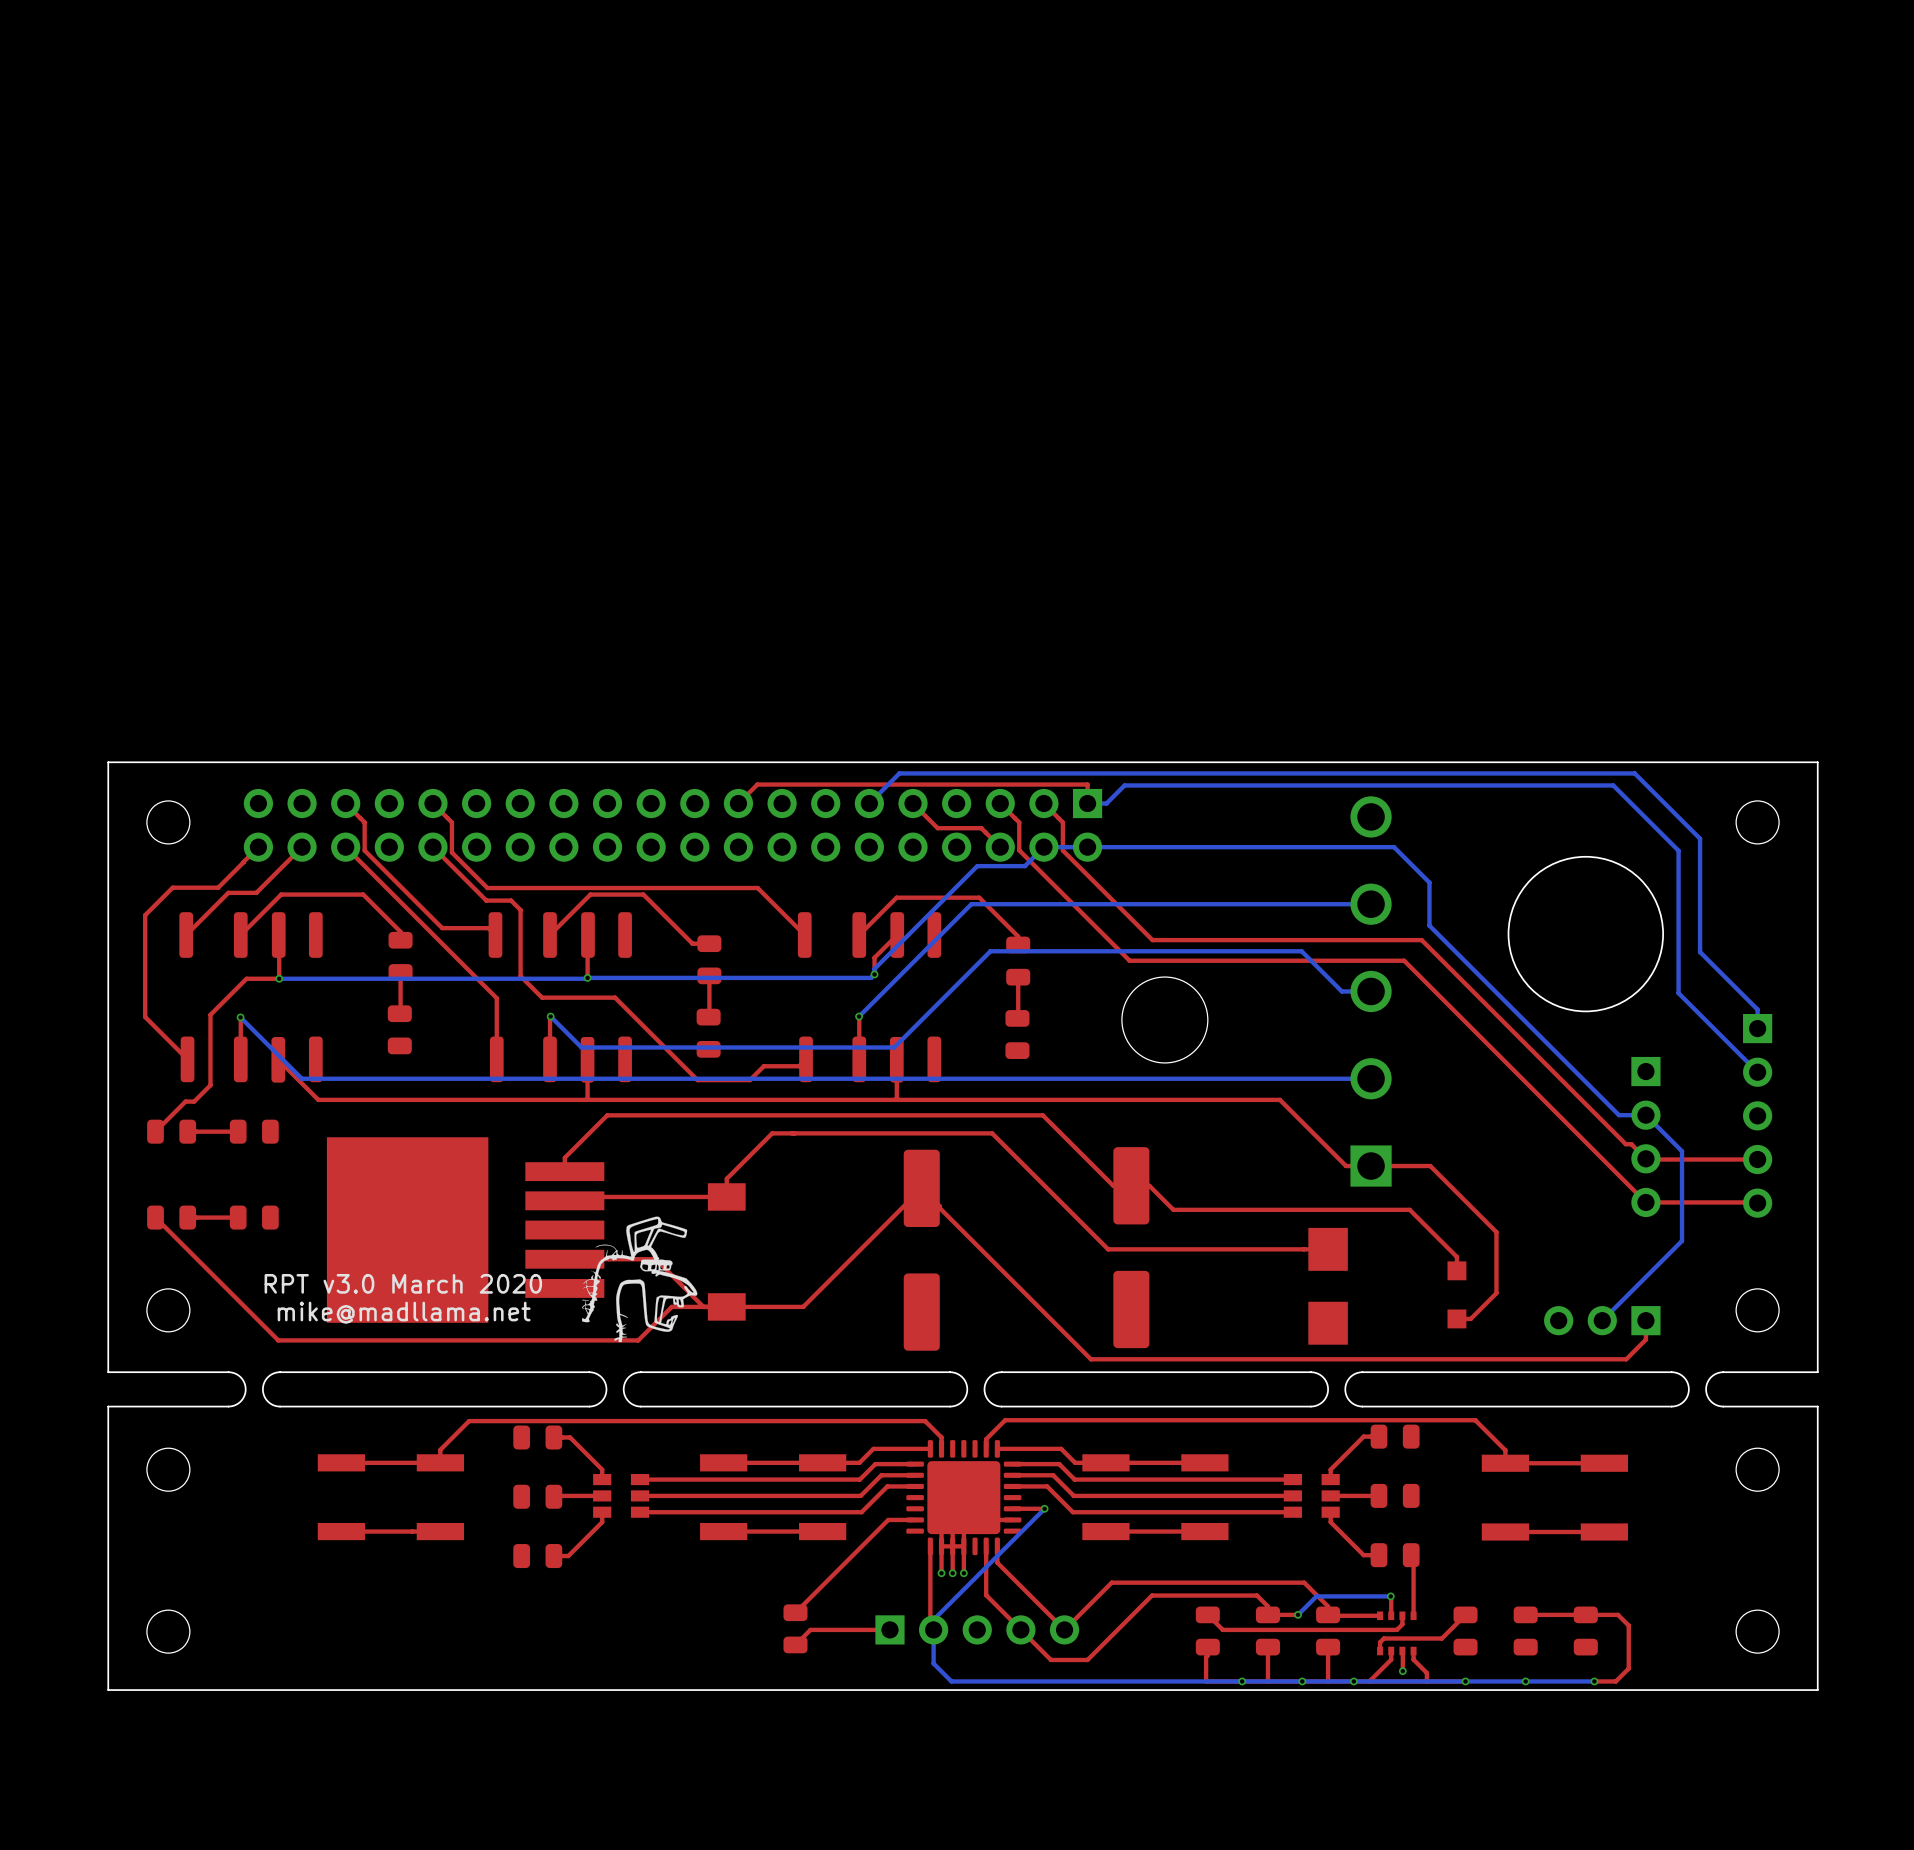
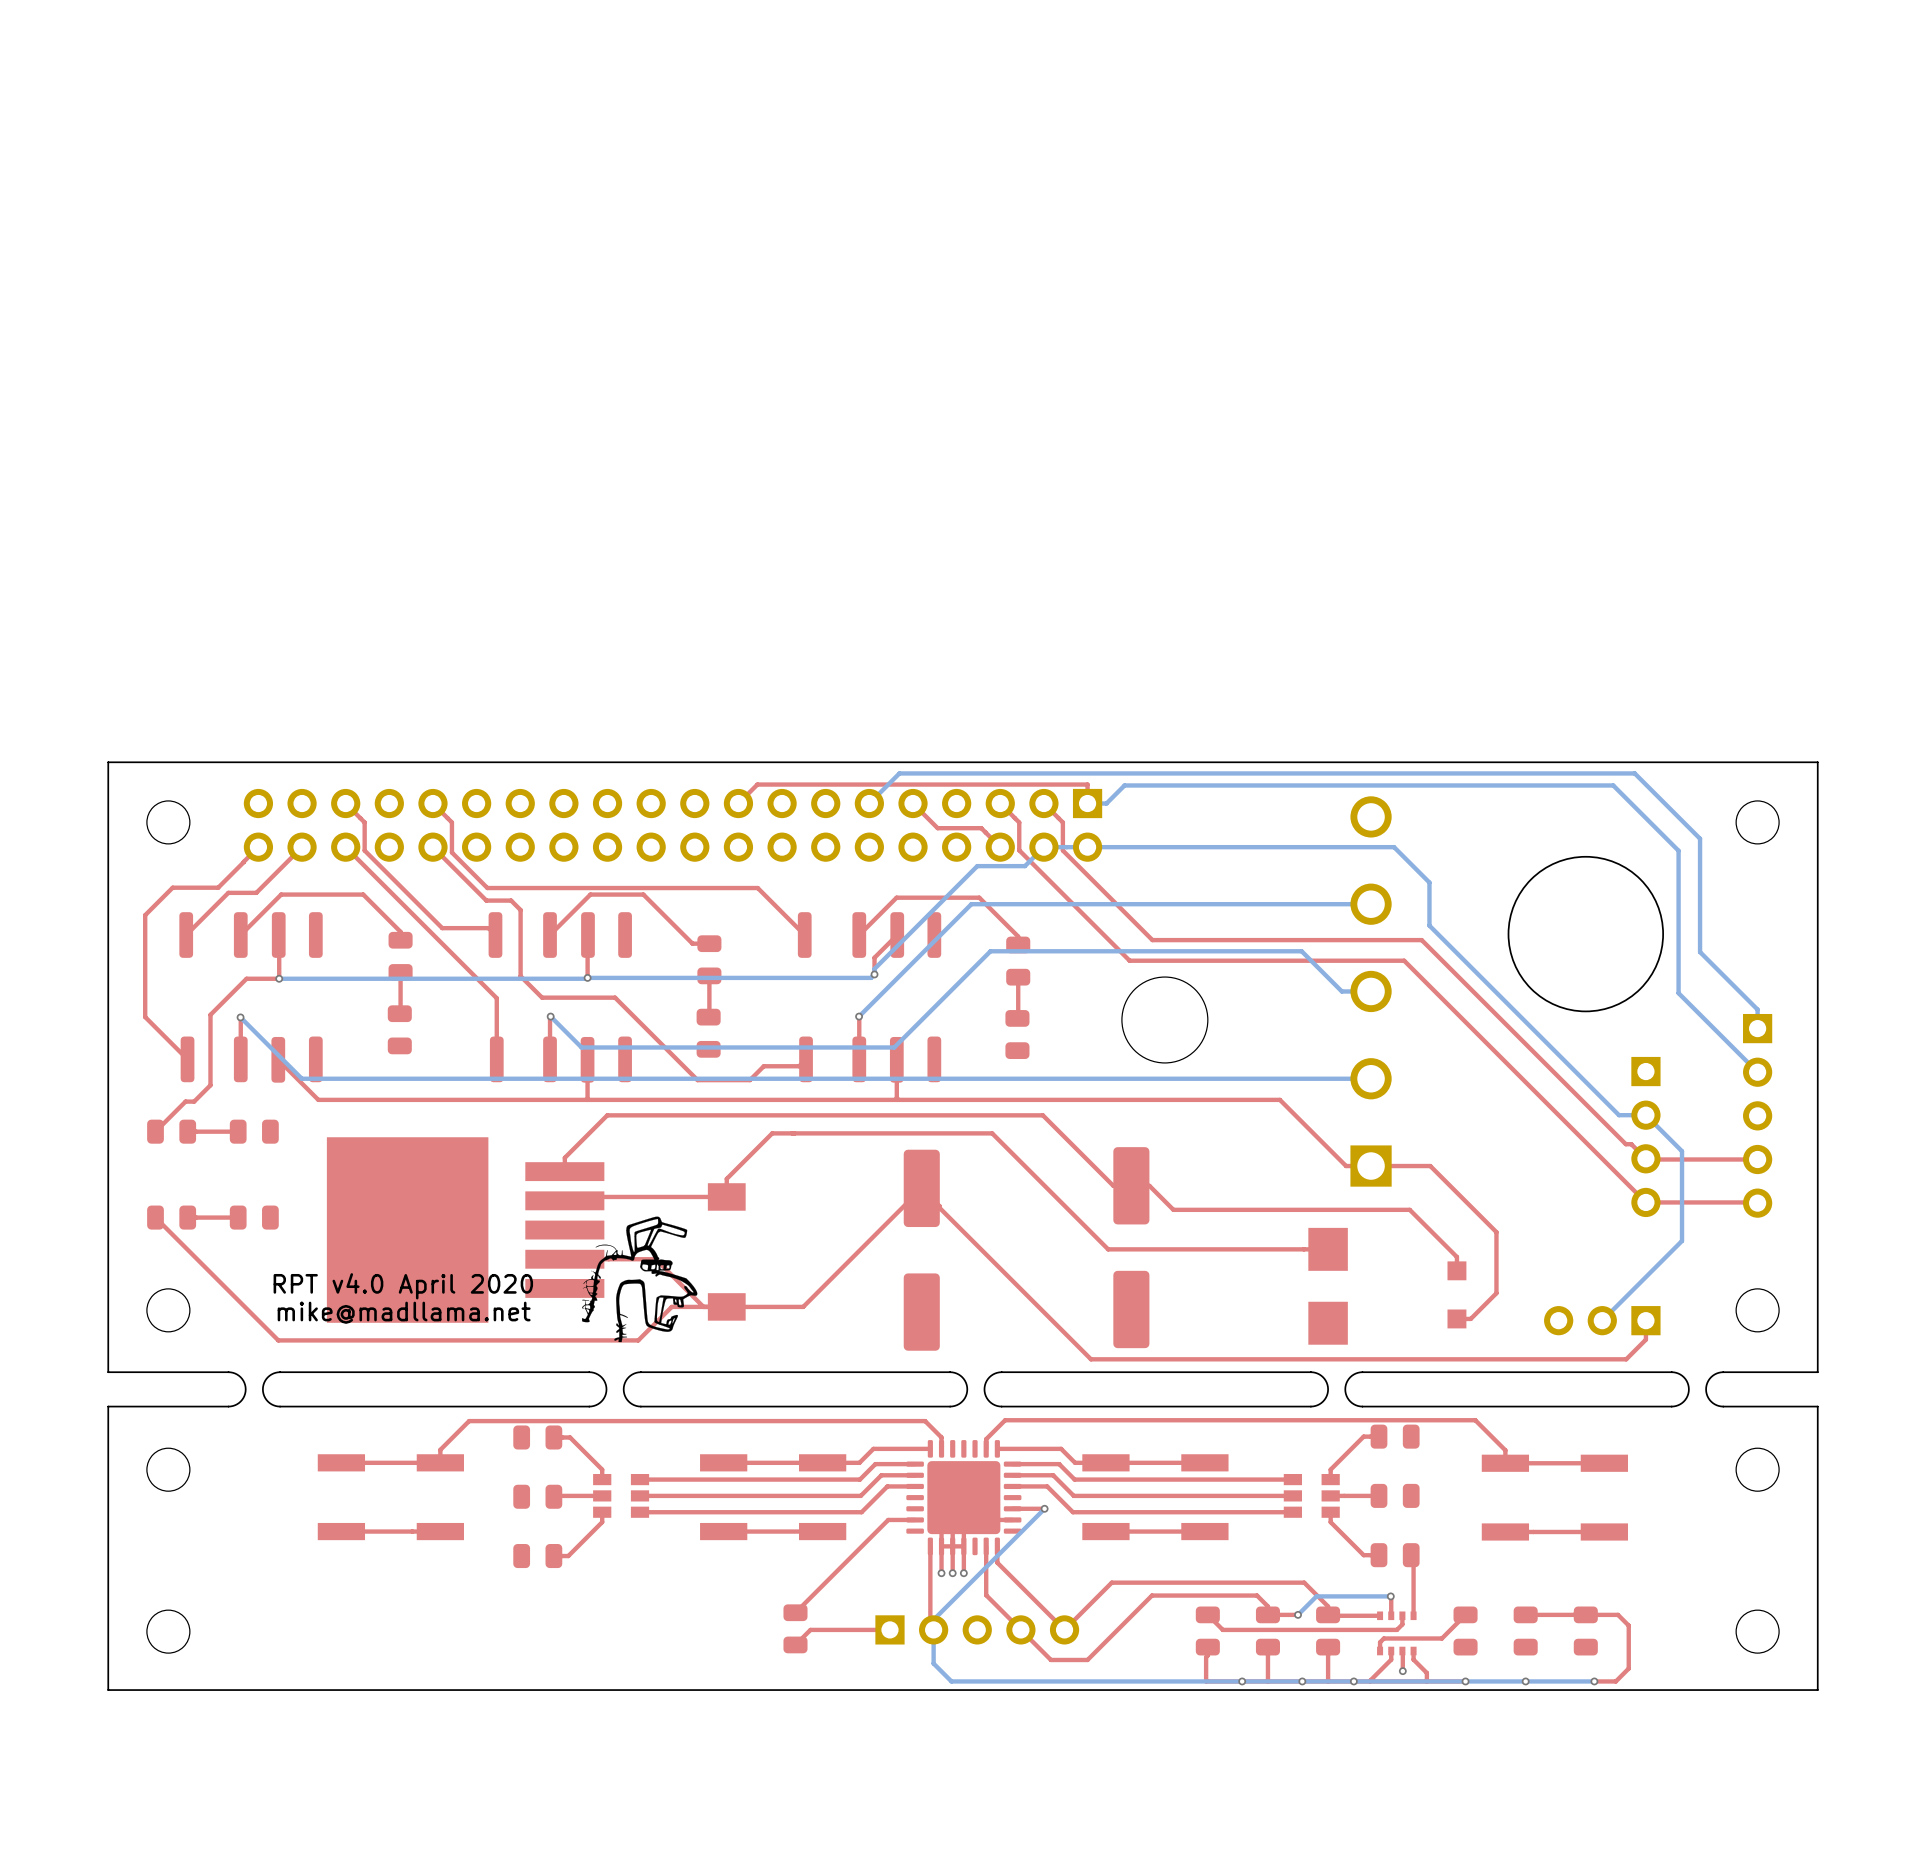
text: RPT v3.0 March 2020 (403, 1283) -> RPT v4.0 April 2020 (403, 1286)

